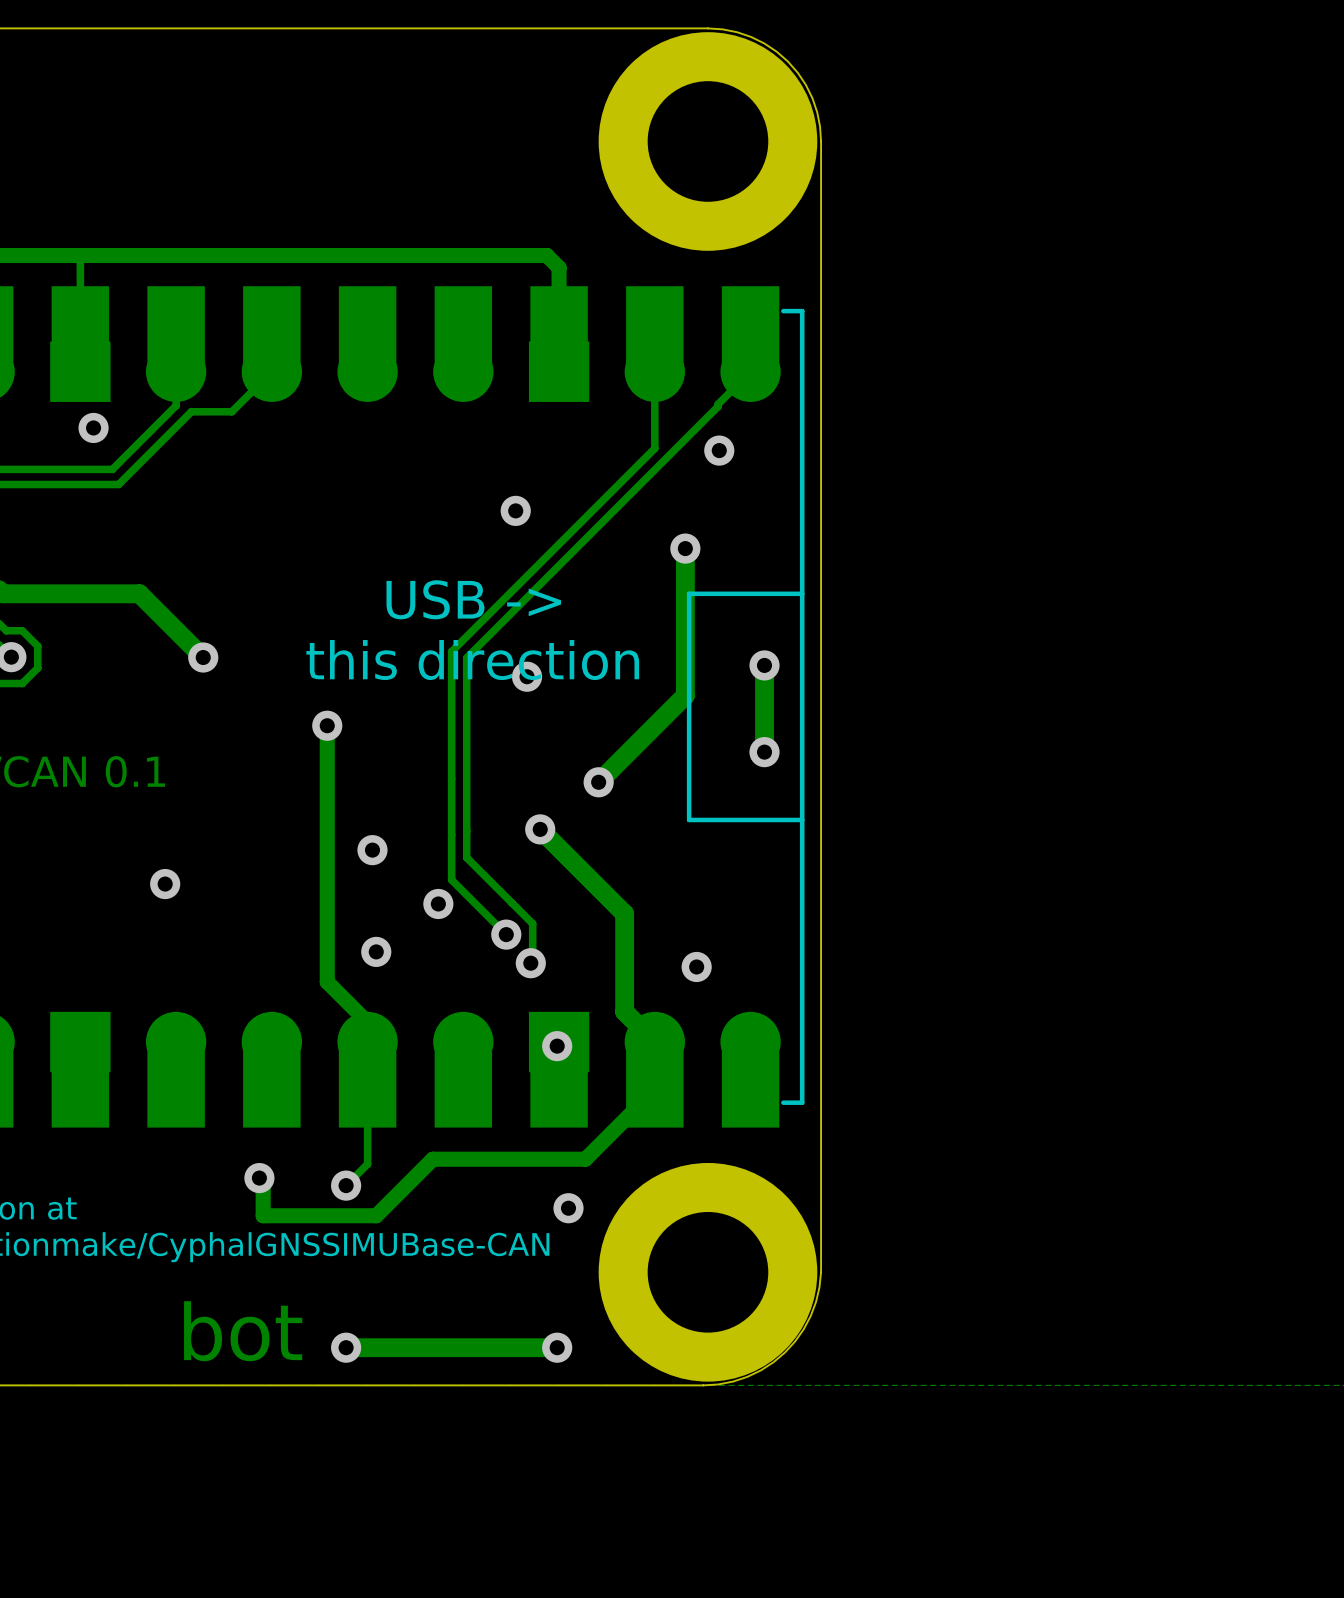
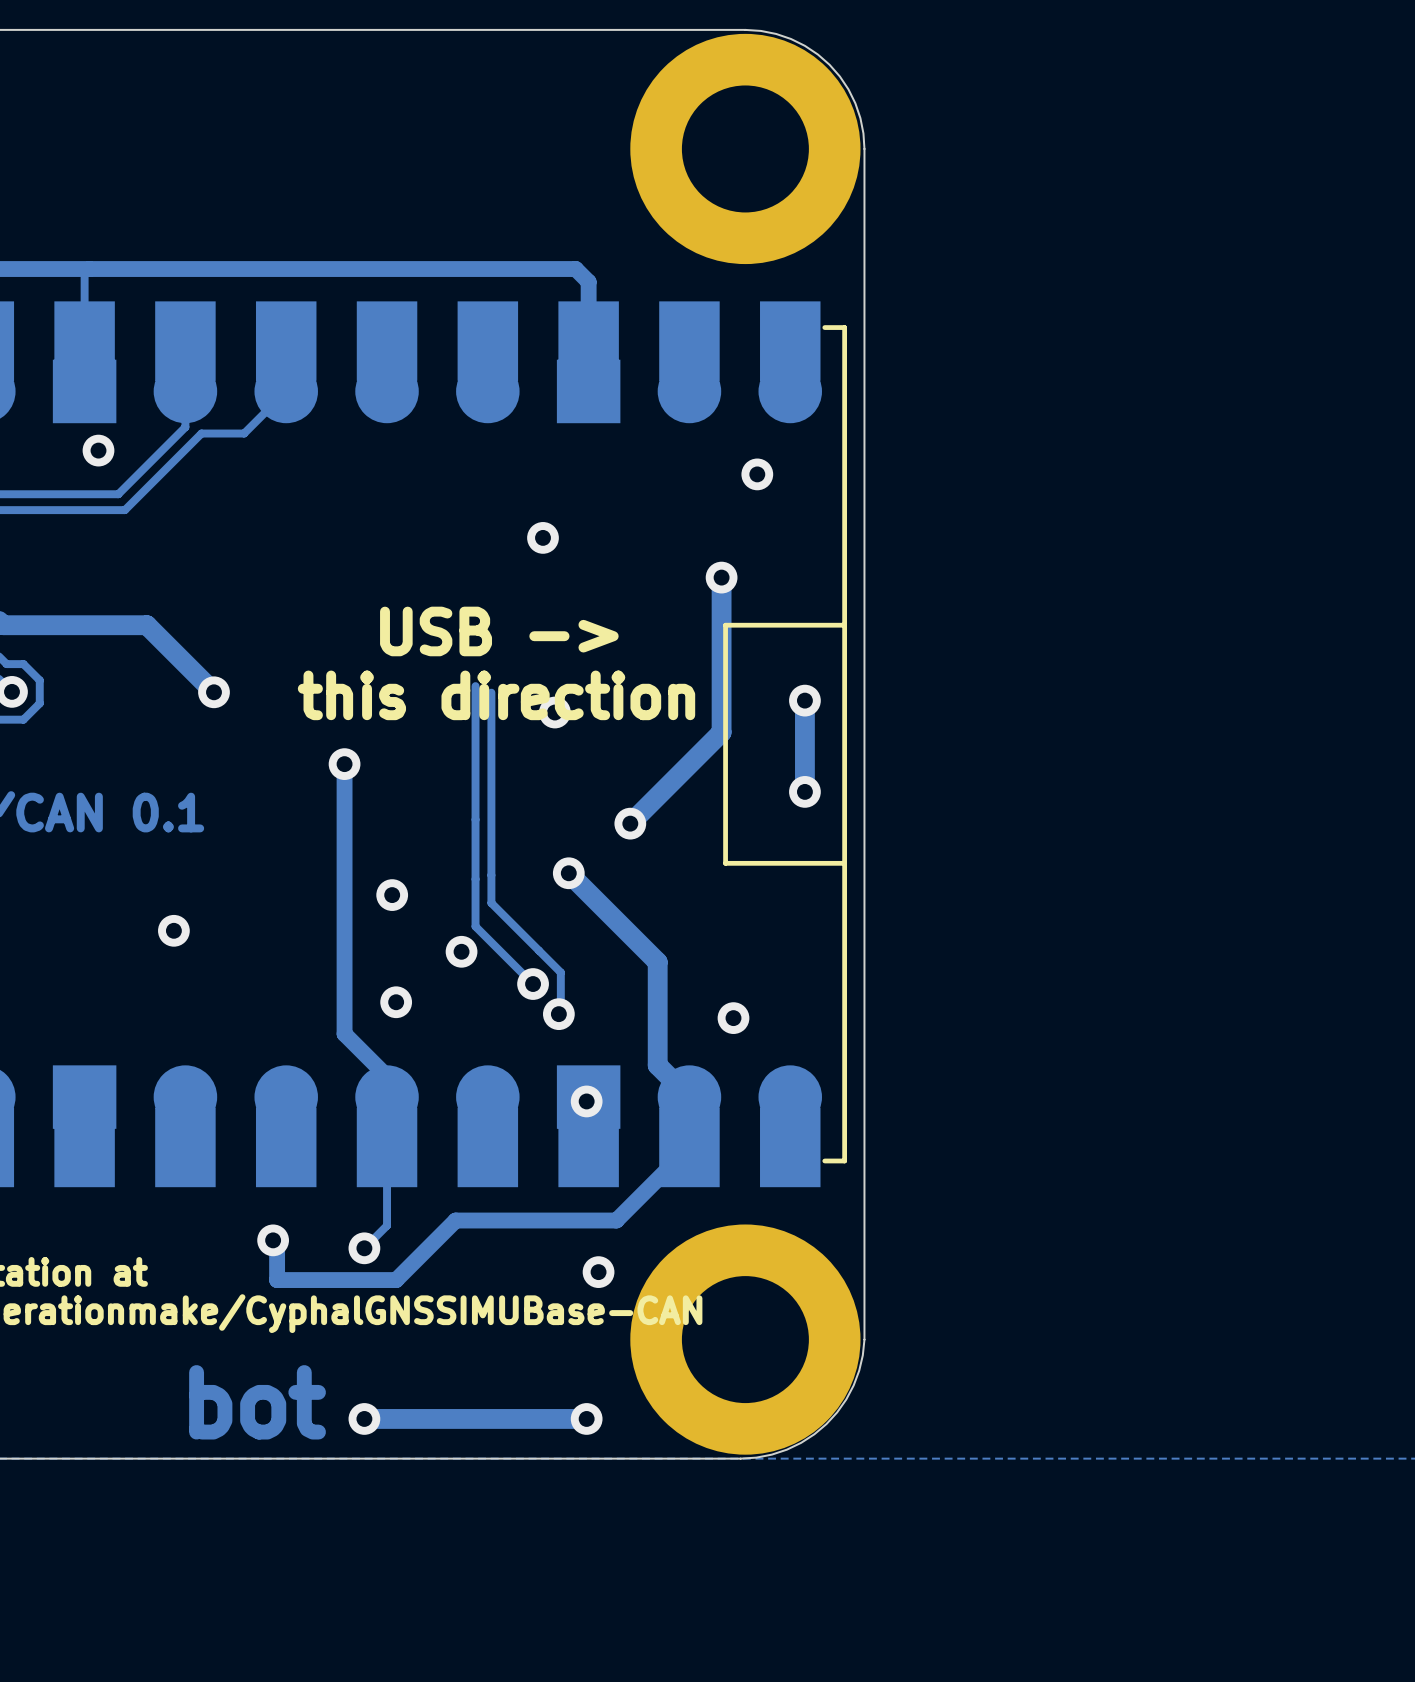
track: (654, 371) (654, 448) (451, 651) -> none
track: (750, 371) (466, 657) -> none

